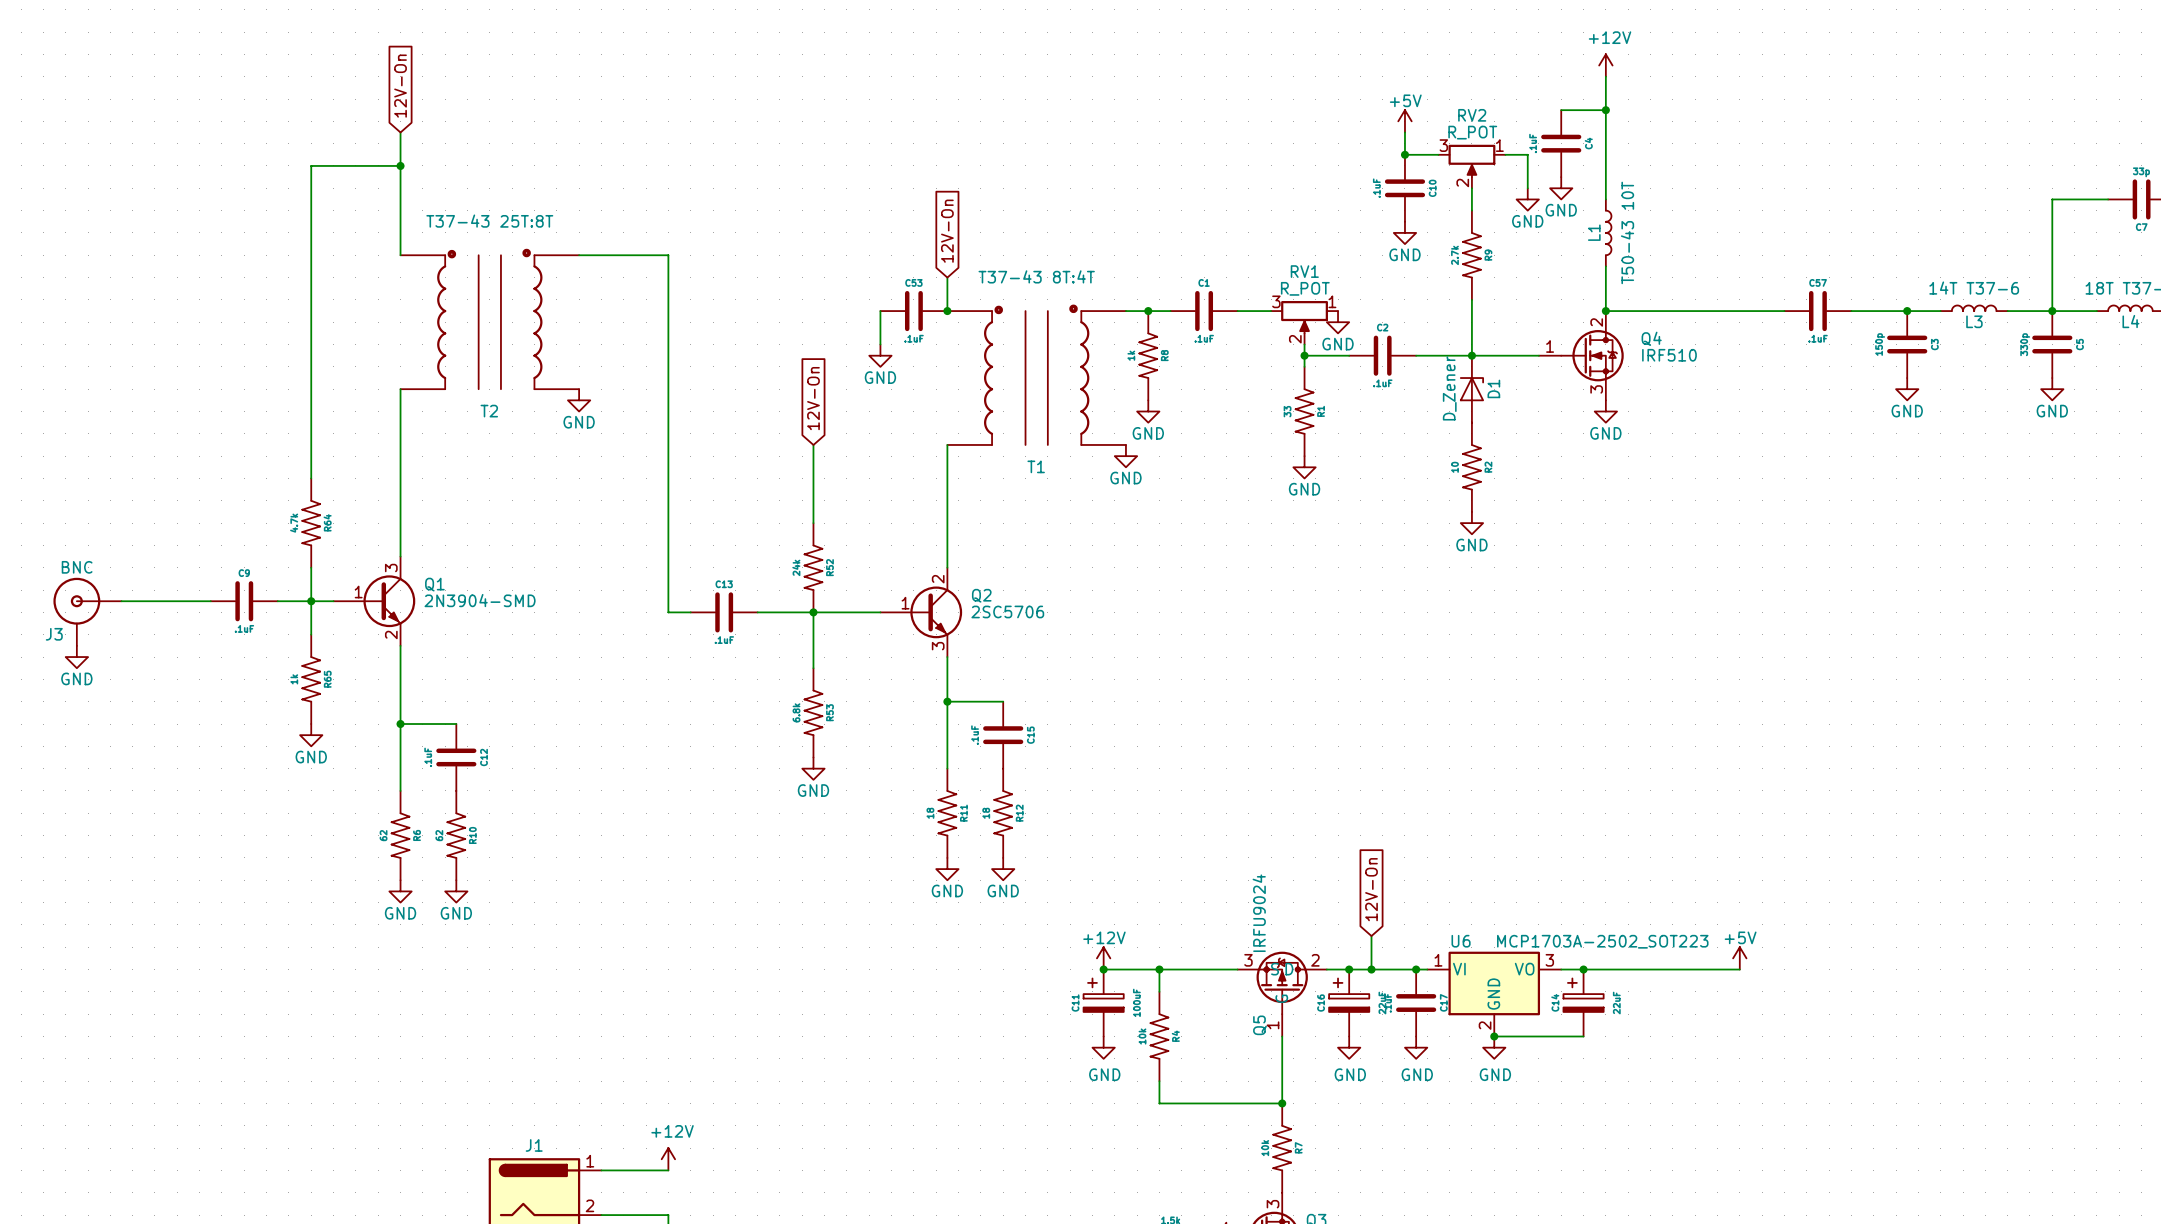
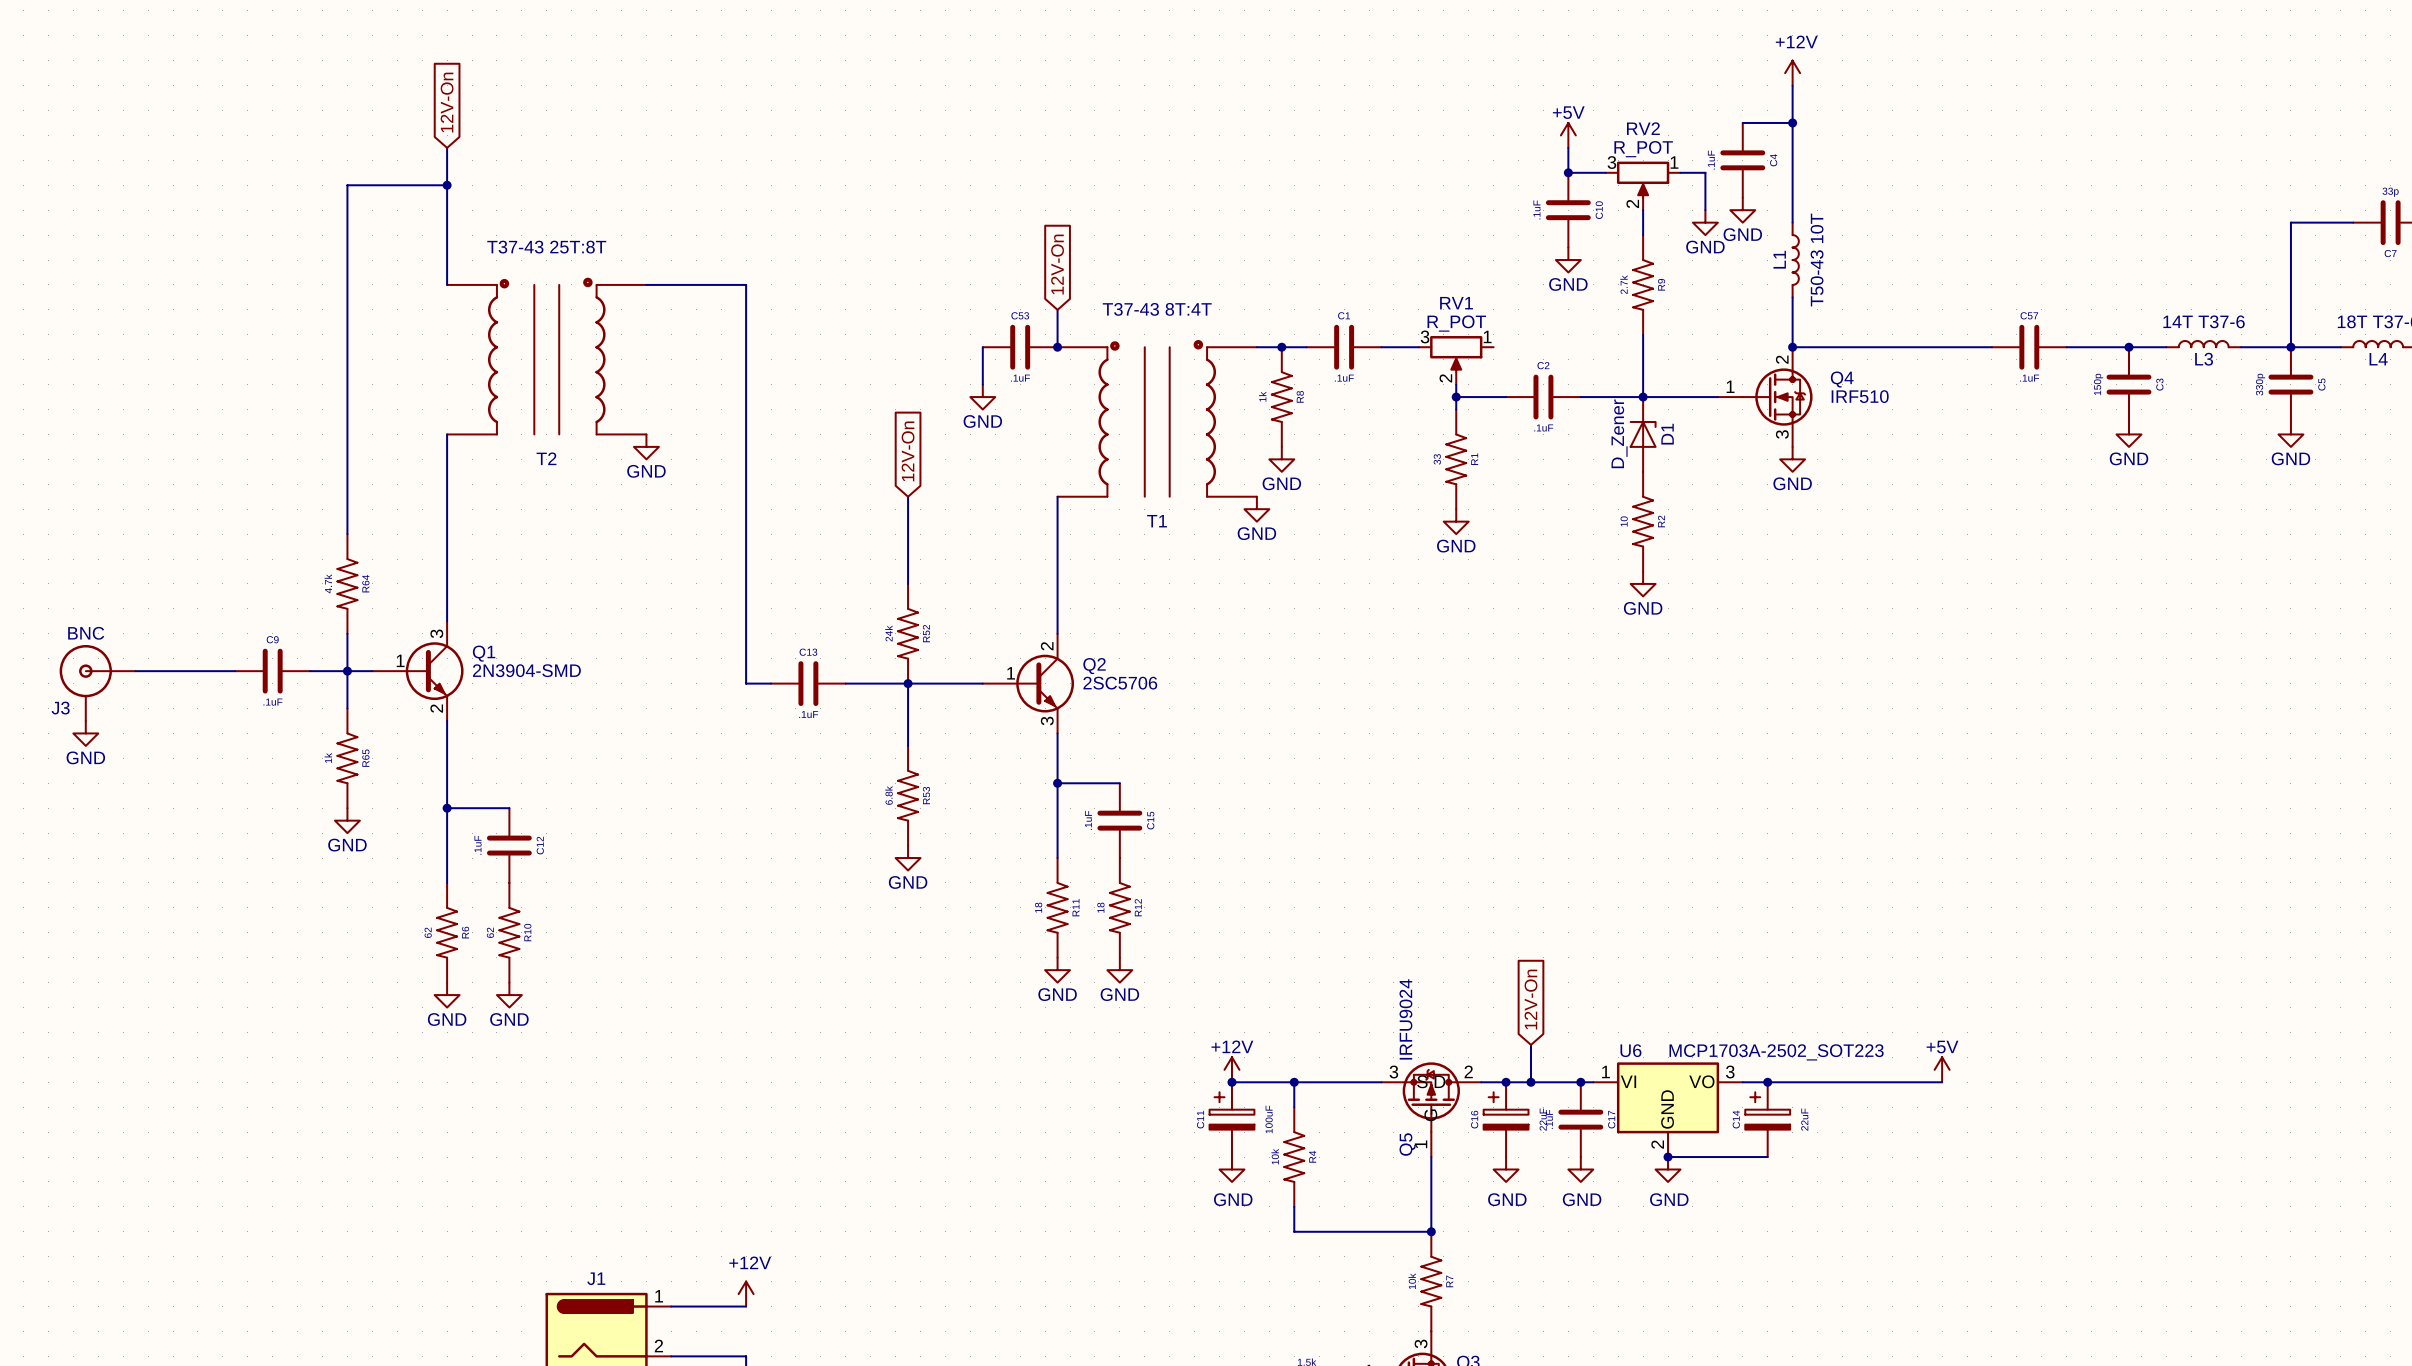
power symbol: GND (1338, 322) -> none

